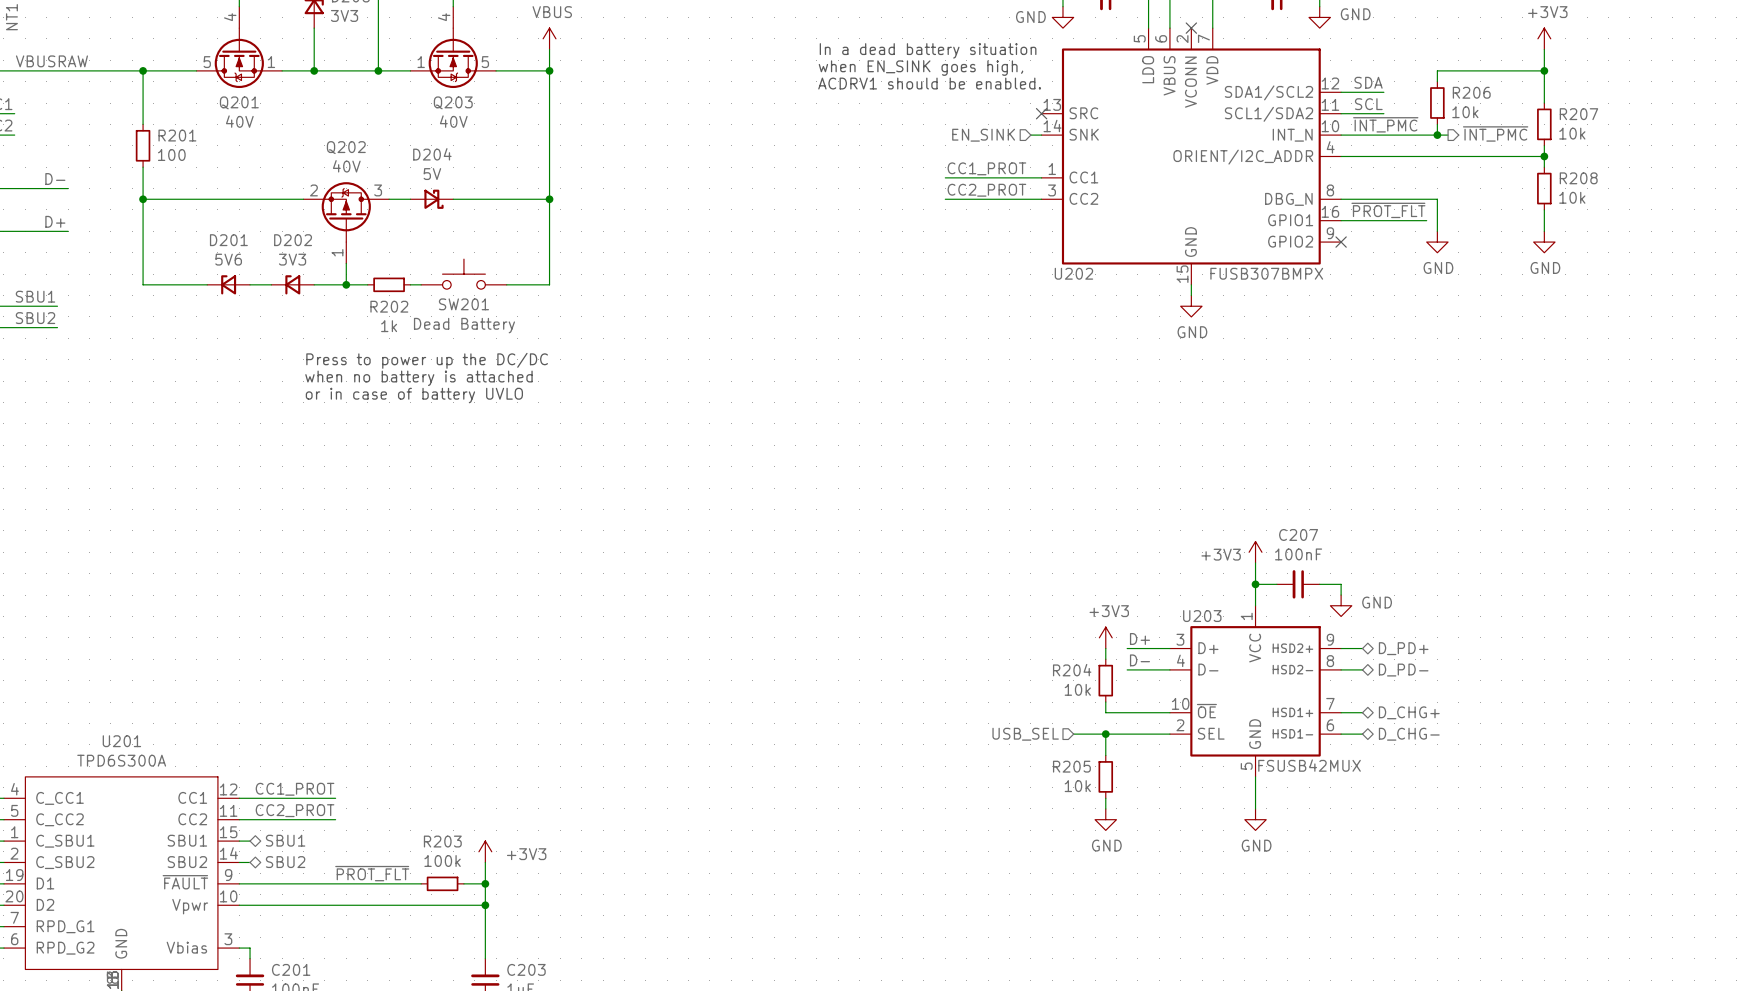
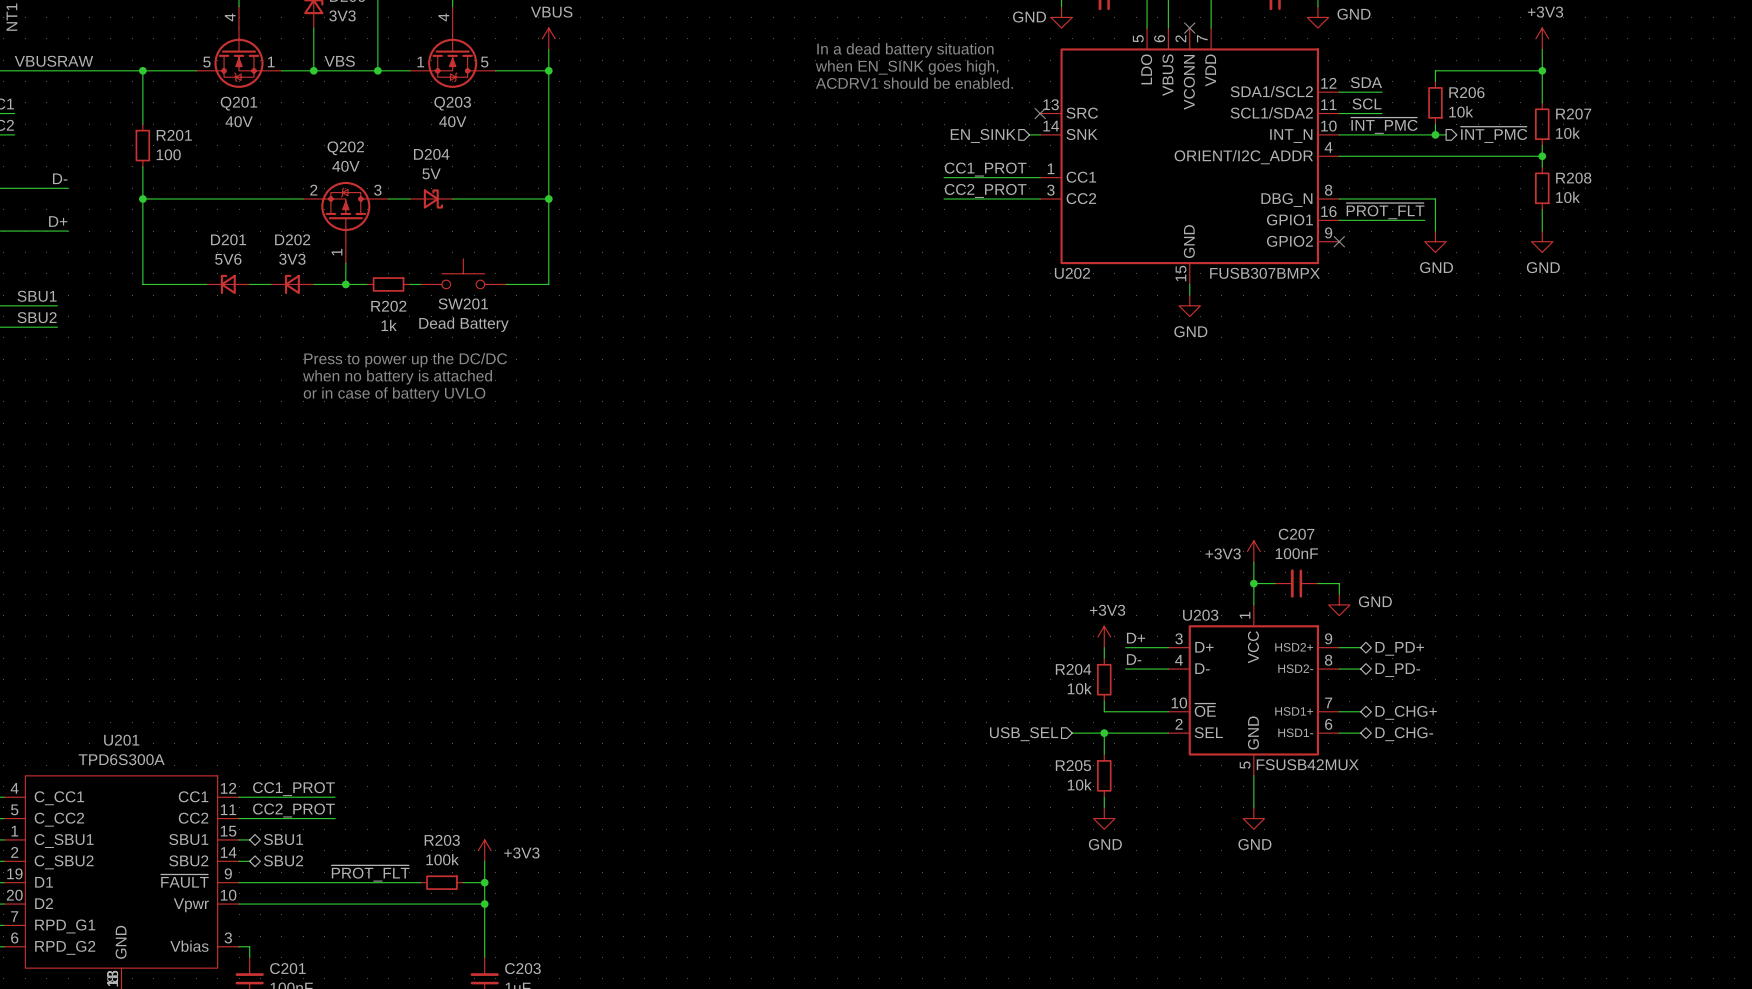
label: none -> VBS (339, 61)

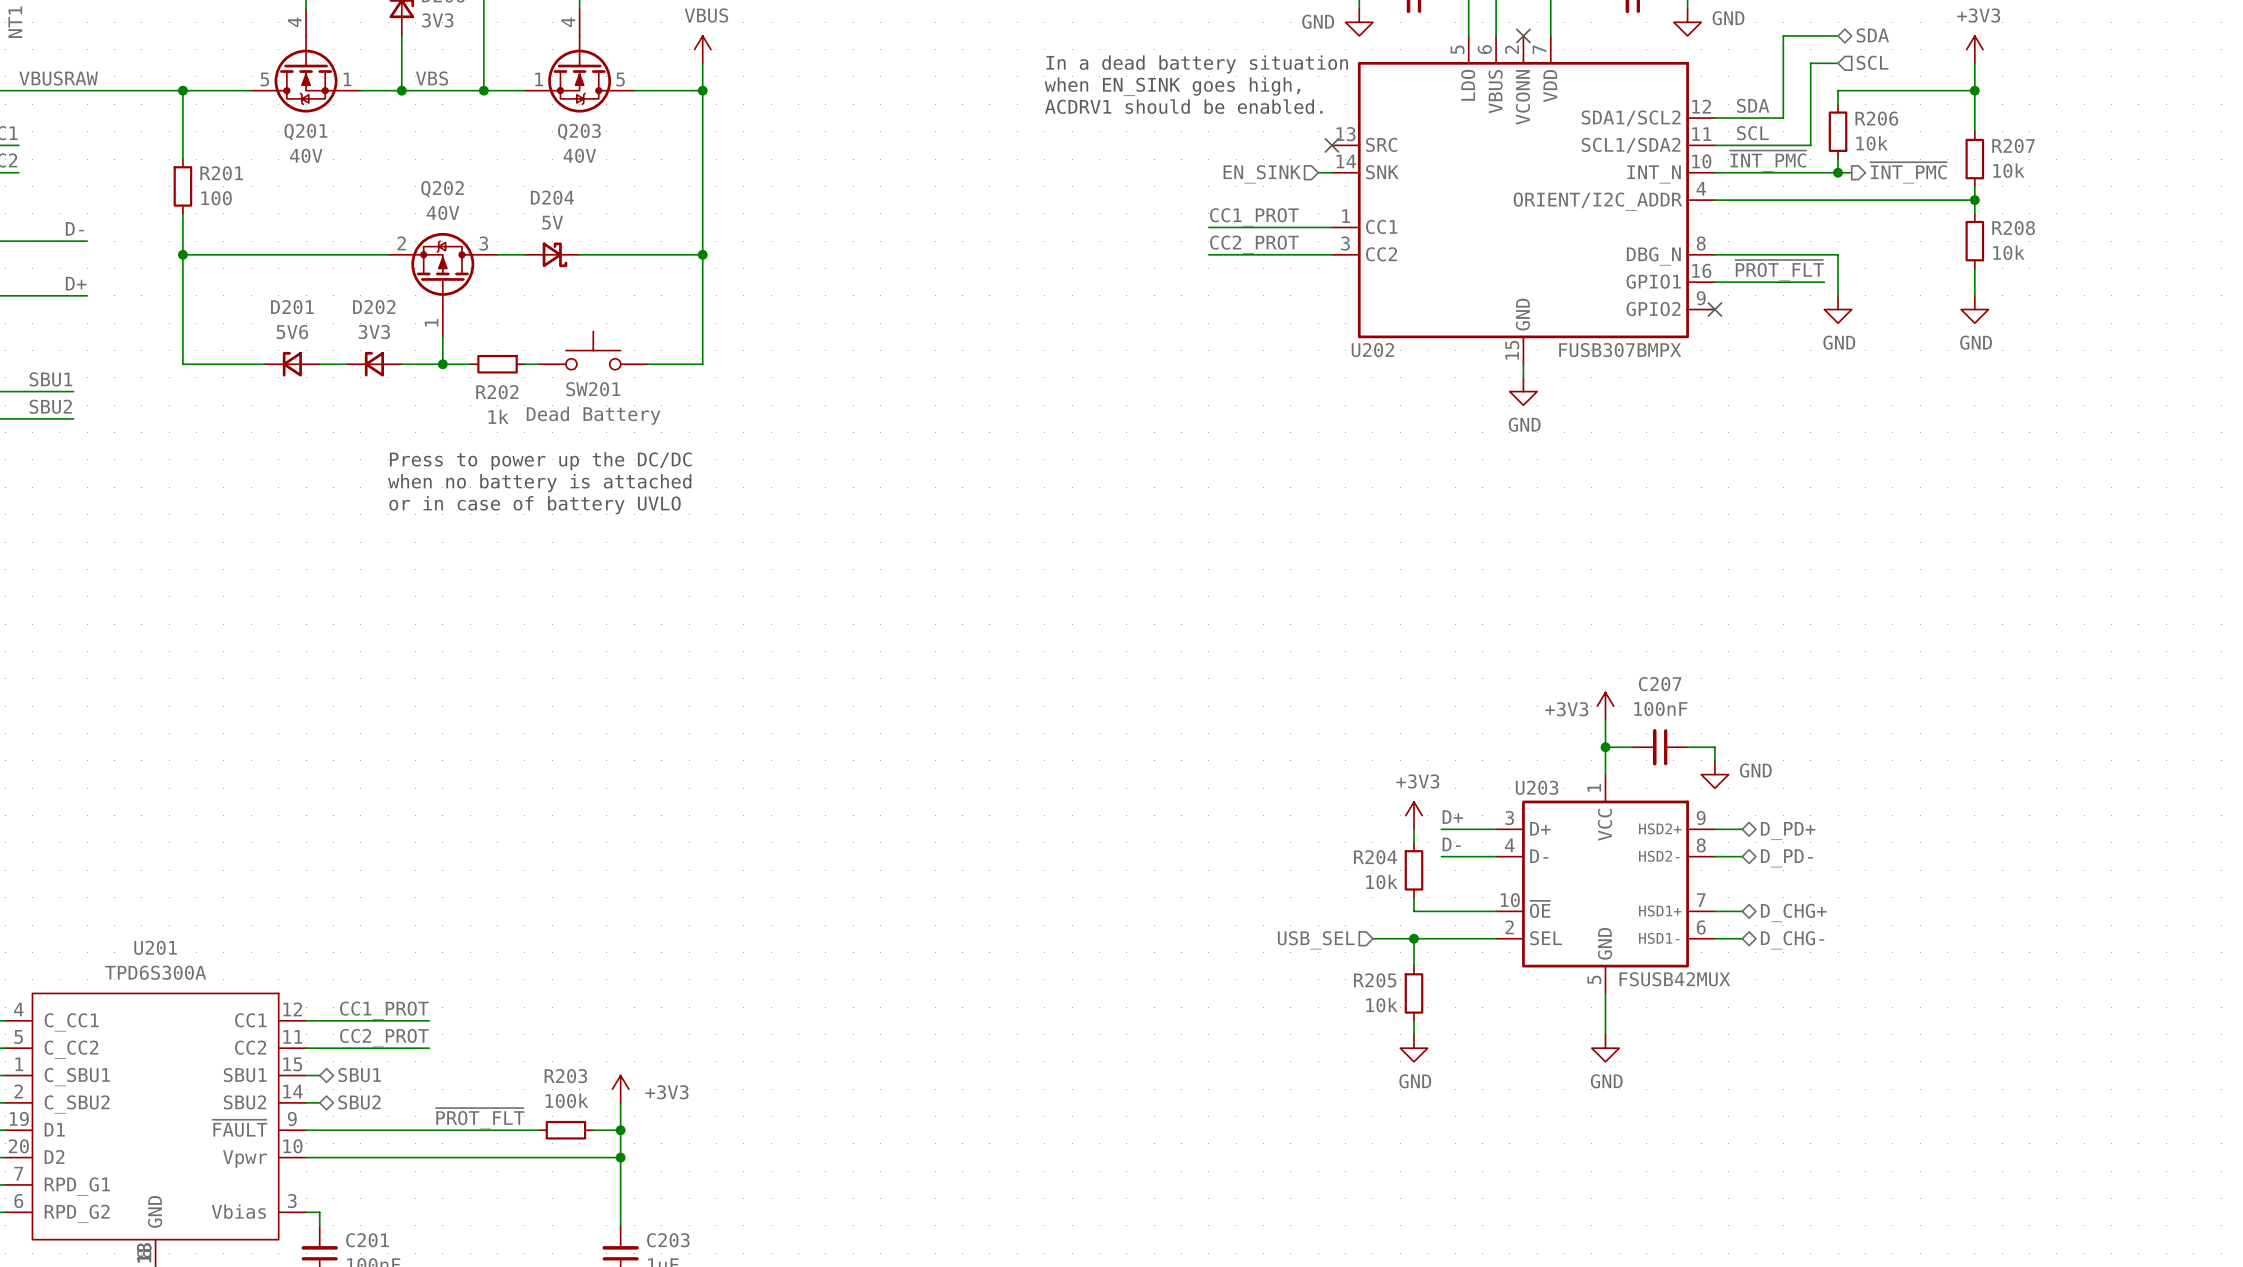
hierarchical label: none -> SDA (1872, 35)
wire: none -> (1838, 35) (1783, 35) (1783, 118) (1769, 118)
wire: none -> (1838, 63) (1810, 63) (1810, 145) (1769, 145)
hierarchical label: none -> SCL (1872, 62)

